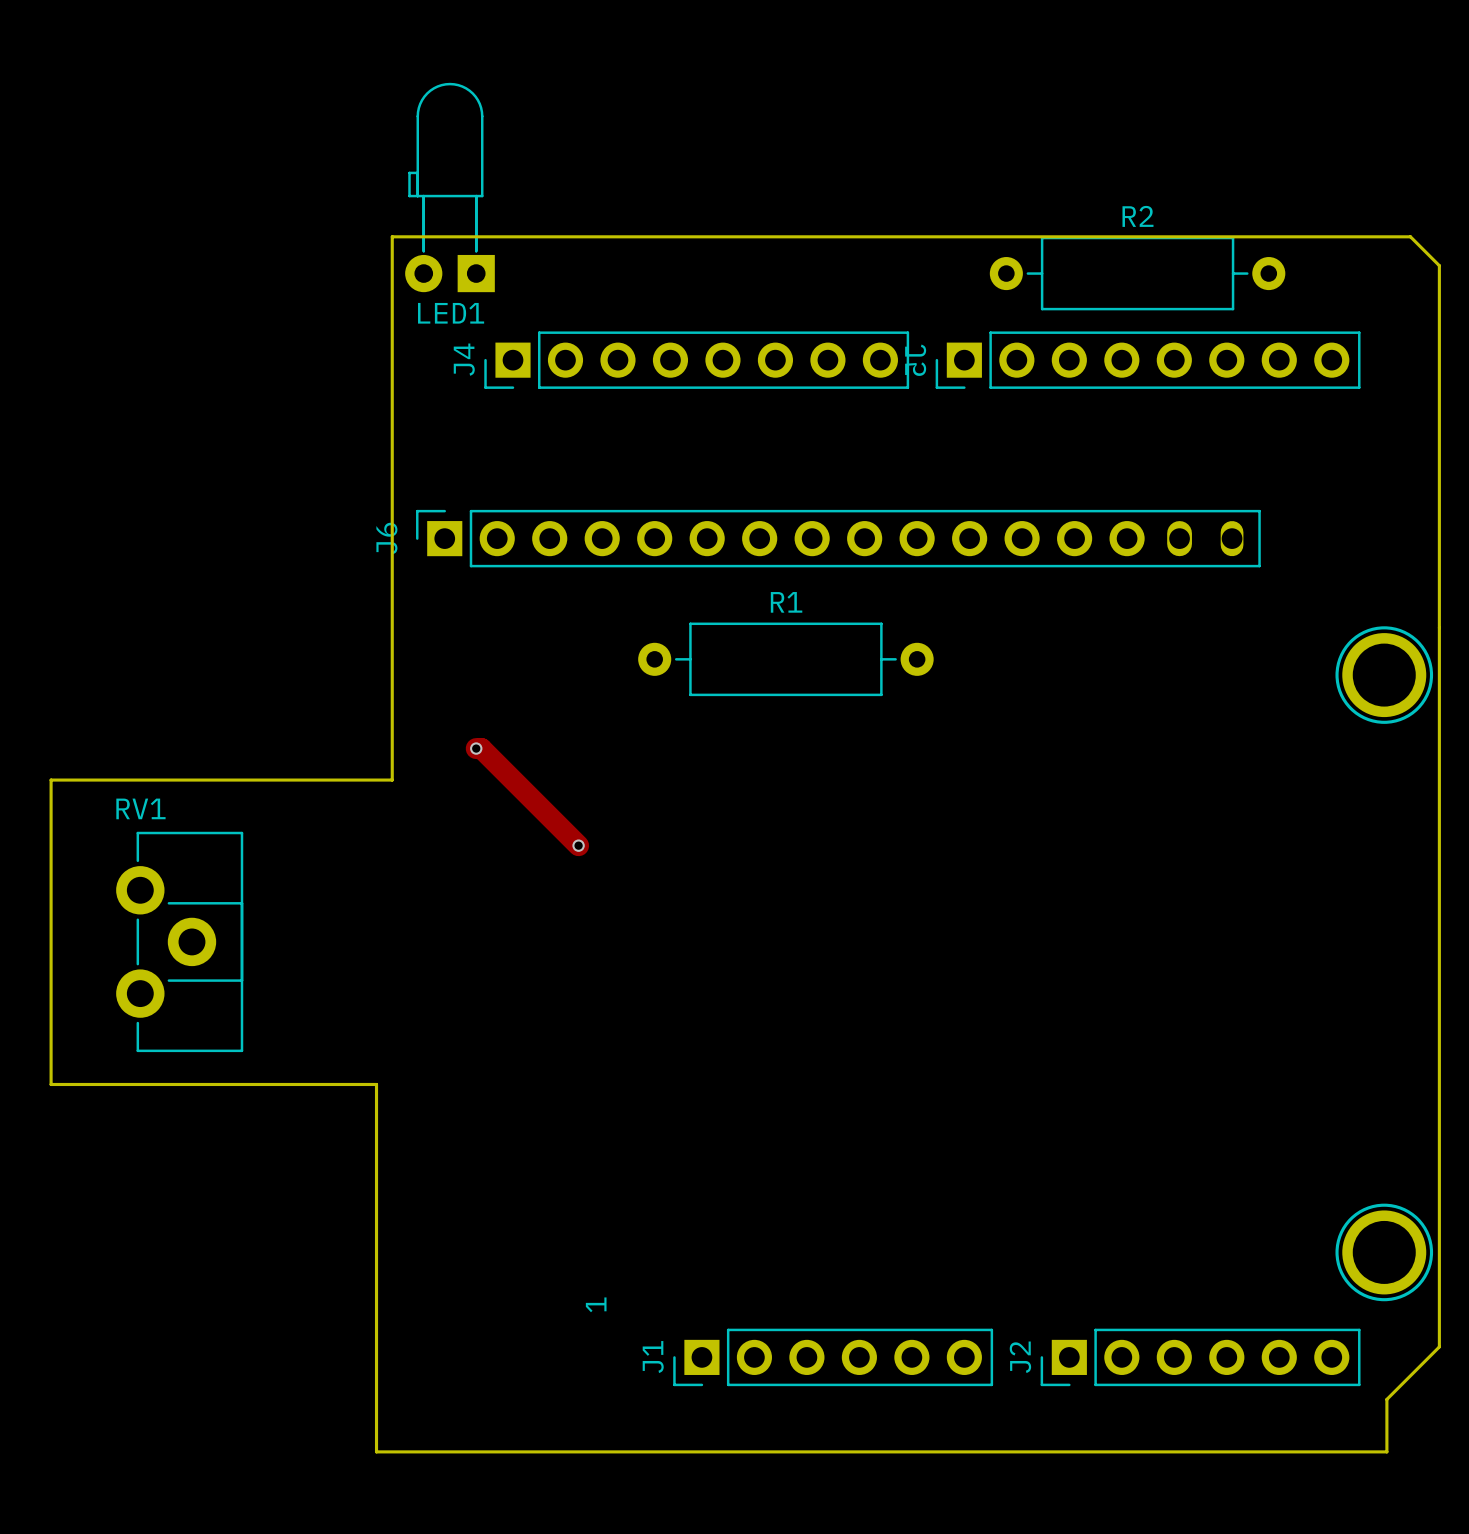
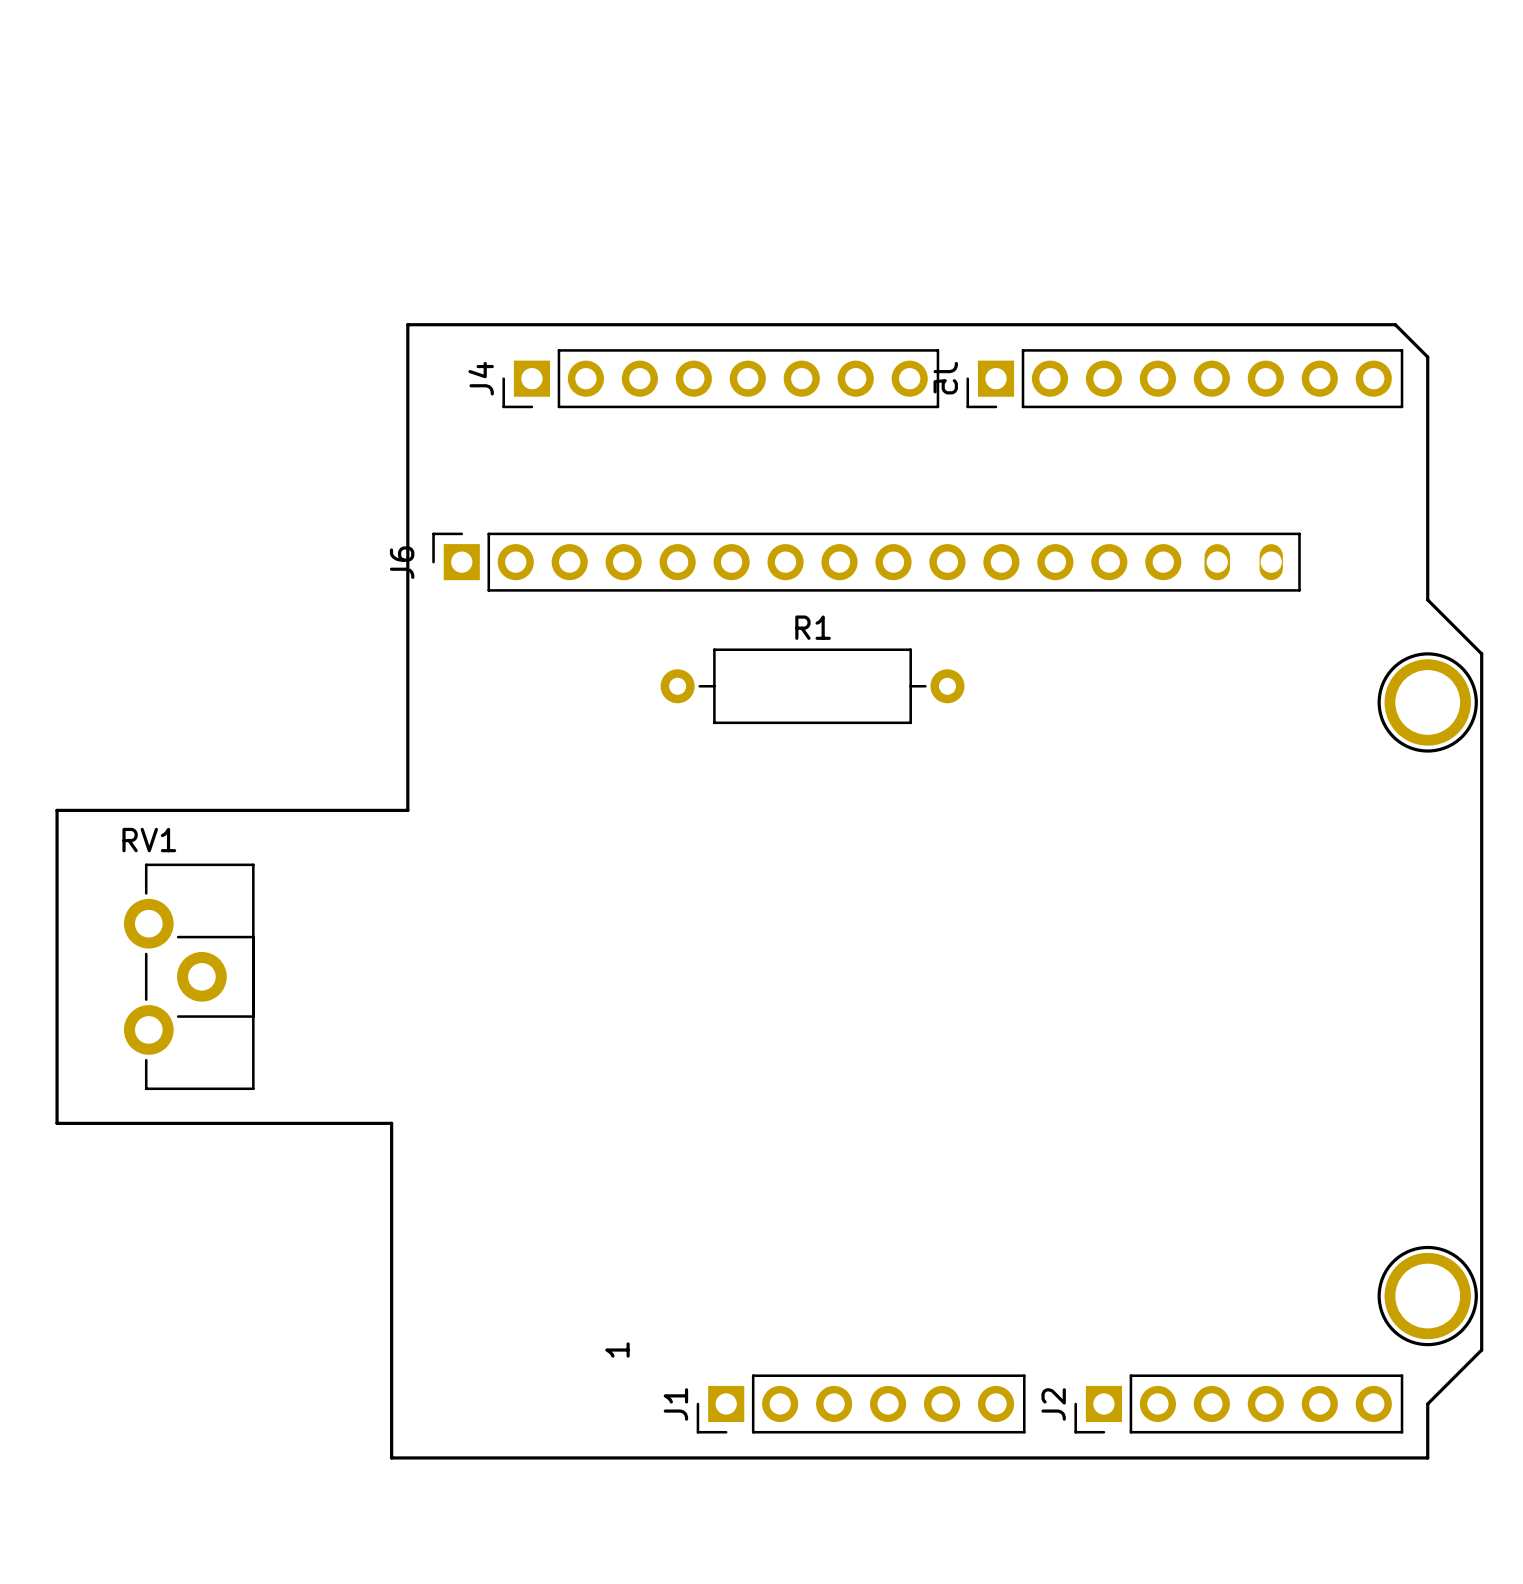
LED1: (450, 187) -> none
R2: (1137, 273) -> none
board edge: (392, 307) (392, 236) (1410, 236) (1439, 265) (1439, 1346) (1386, 1399) (1386, 1451) (376, 1451) (376, 1409) -> (407, 324) (1395, 324) (1427, 357) (1427, 599) (1481, 653) (1481, 1350) (1427, 1403) (1427, 1457) (391, 1457)
track: (476, 748) (481, 748) (578, 845) -> none
via: (476, 748) -> none
via: (578, 845) -> none

